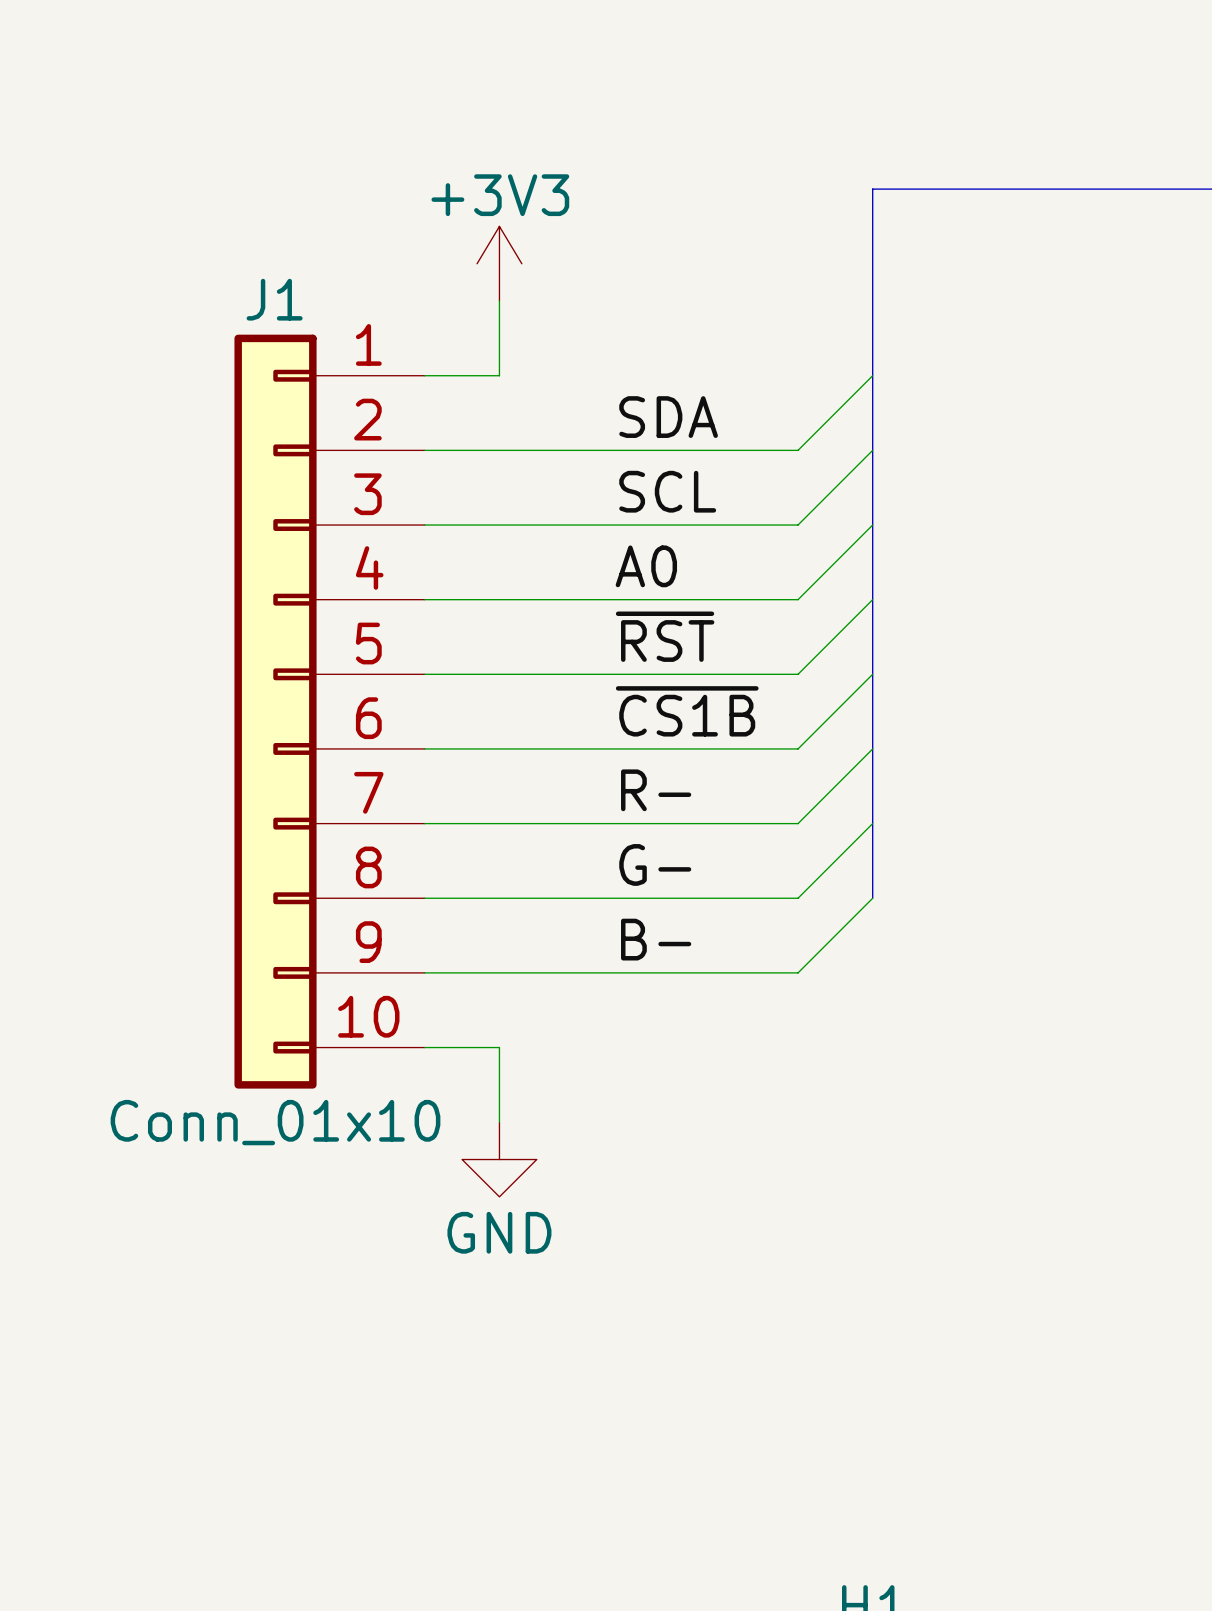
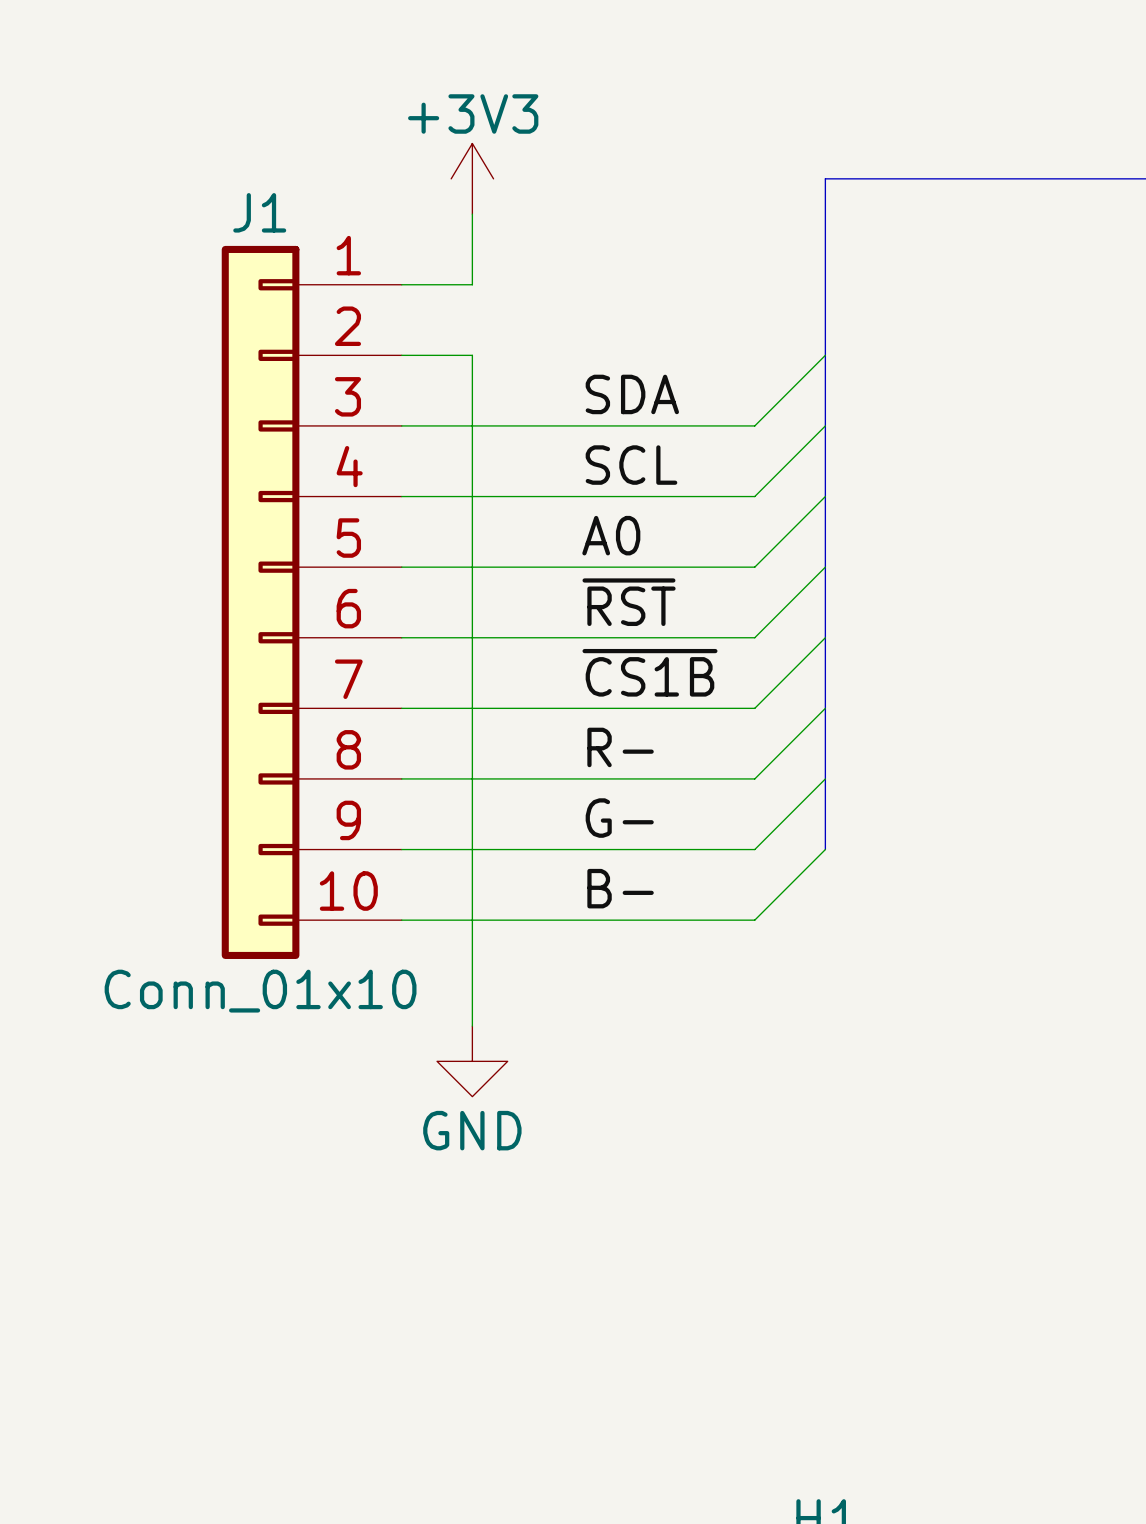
wire: none -> (472, 214) (472, 284) (401, 284)
power symbol position: +3V3 (499, 263) -> +3V3 (472, 178)
wire: (499, 301) (499, 375) -> none
J1 position: (329, 711) -> (311, 602)
wire: (424, 1047) (499, 1047) -> (472, 355) (472, 990)
power symbol position: GND (499, 1159) -> GND (472, 1061)

